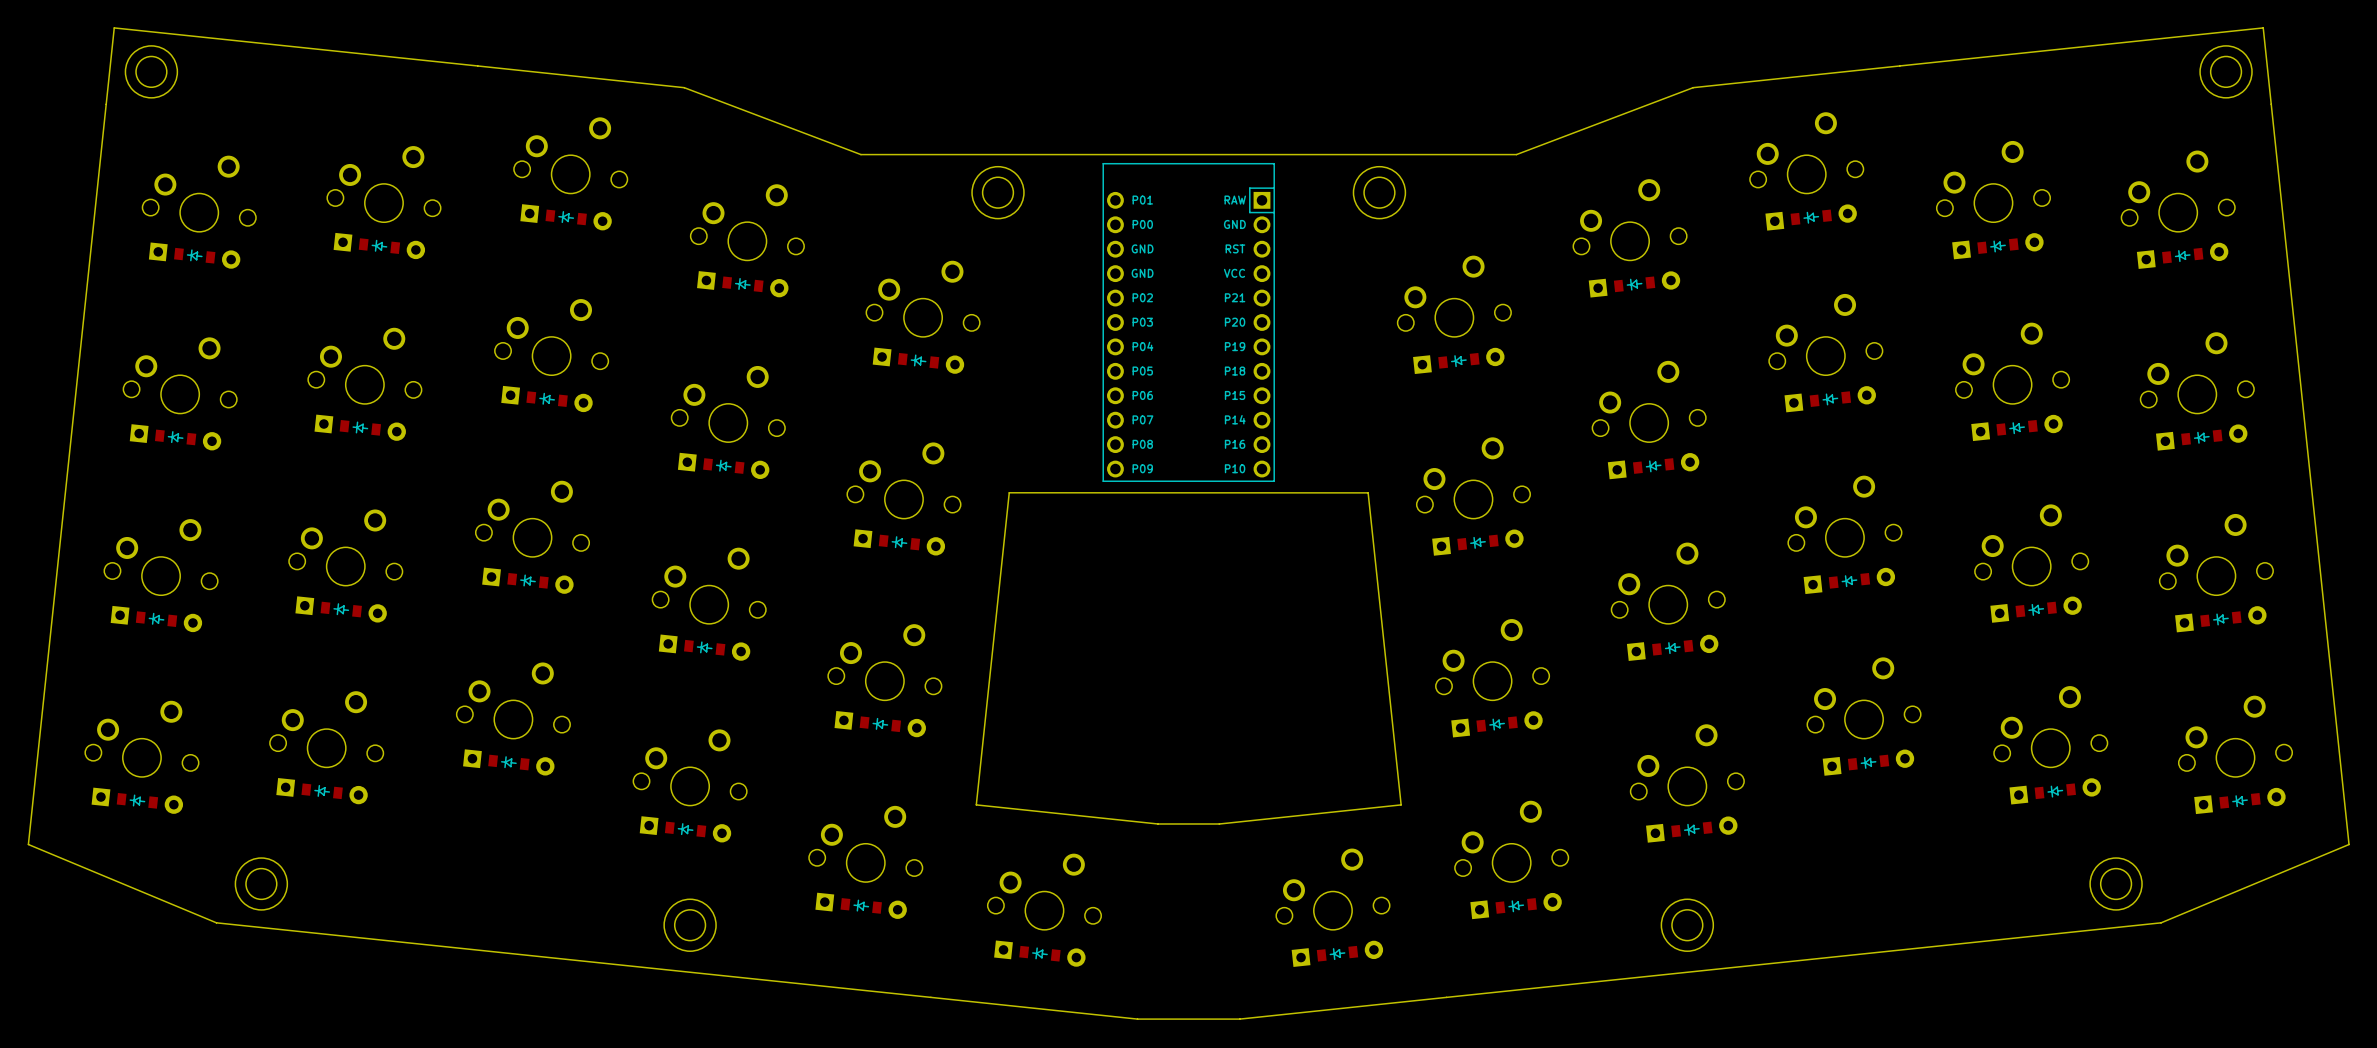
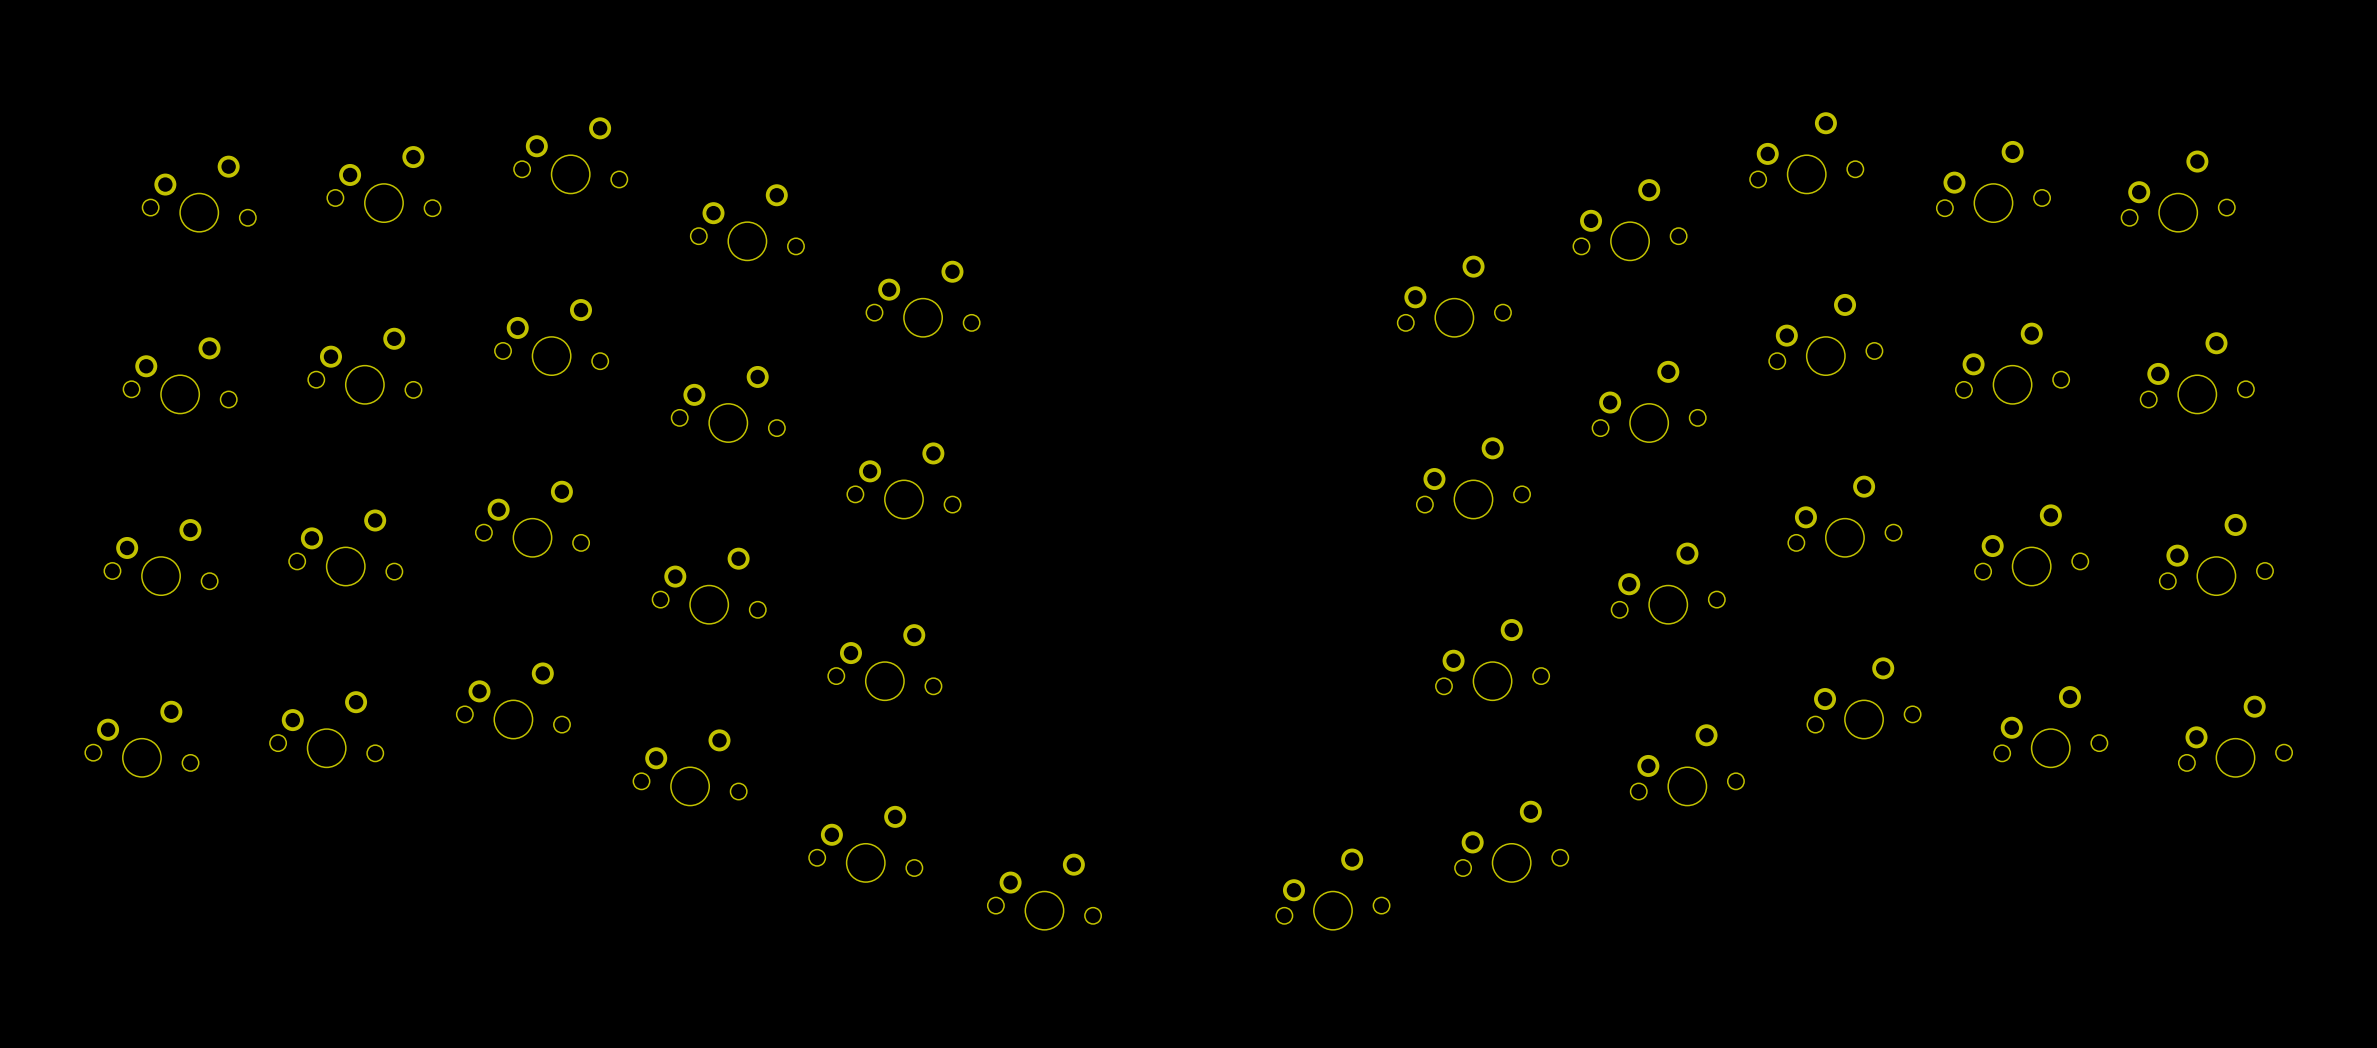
board edge: (114, 27) (684, 87) (860, 154) (1516, 154) (1693, 87) (2263, 27) (2349, 844) (2161, 922) (1239, 1019) (1137, 1019) (216, 922) (28, 844) (114, 27) -> none
round board edge: [125, 45, 178, 99] -> none
round board edge: [2199, 45, 2253, 99] -> none
round board edge: [135, 56, 168, 88] -> none
round board edge: [2210, 56, 2242, 88] -> none
round board edge: [971, 166, 1025, 219] -> none
round board edge: [1353, 166, 1406, 219] -> none
round board edge: [982, 177, 1014, 209] -> none
round board edge: [1363, 177, 1396, 209] -> none
part: (566, 217) -> none
part: (1811, 217) -> none
part: (379, 246) -> none
part: (1997, 246) -> none
part: (194, 255) -> none
part: (2182, 255) -> none
part: (742, 284) -> none
part: (1634, 284) -> none
part: (1188, 322) -> none
part: (918, 360) -> none
part: (1458, 360) -> none
part: (546, 398) -> none
part: (1830, 399) -> none
part: (360, 427) -> none
part: (2016, 427) -> none
part: (175, 437) -> none
part: (2201, 437) -> none
part: (723, 465) -> none
part: (1653, 466) -> none
board edge: (1009, 492) (1368, 492) (1401, 804) (1219, 823) (1158, 823) (976, 804) (1009, 492) -> none
part: (899, 542) -> none
part: (1477, 542) -> none
part: (527, 580) -> none
part: (1849, 580) -> none
part: (341, 609) -> none
part: (2036, 609) -> none
part: (156, 619) -> none
part: (2220, 619) -> none
part: (704, 647) -> none
part: (1672, 647) -> none
part: (880, 724) -> none
part: (1496, 724) -> none
part: (508, 762) -> none
part: (1868, 762) -> none
part: (322, 791) -> none
part: (2055, 791) -> none
part: (137, 800) -> none
part: (2239, 800) -> none
part: (685, 829) -> none
part: (1691, 829) -> none
round board edge: [235, 857, 288, 911] -> none
round board edge: [2089, 857, 2143, 911] -> none
round board edge: [245, 868, 277, 900] -> none
round board edge: [2100, 868, 2132, 900] -> none
round board edge: [663, 899, 717, 952] -> none
round board edge: [1661, 899, 1714, 952] -> none
part: (861, 905) -> none
part: (1516, 906) -> none
round board edge: [674, 909, 706, 941] -> none
round board edge: [1671, 909, 1703, 941] -> none
part: (1039, 953) -> none
part: (1337, 953) -> none

